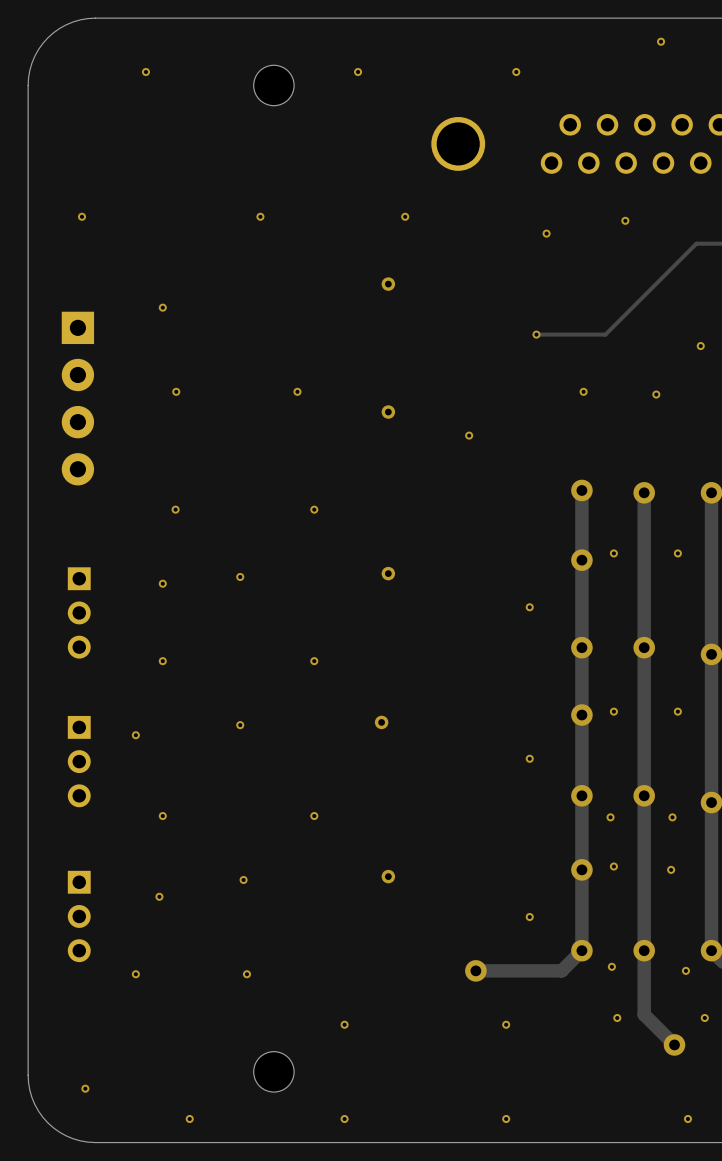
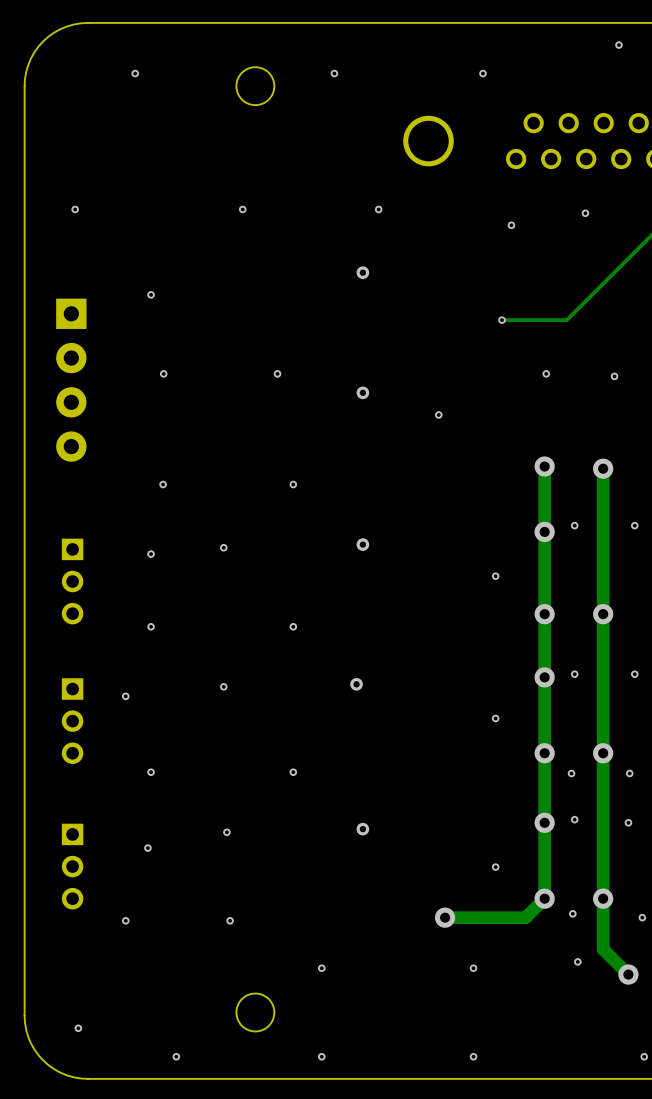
track: (644, 1004) (644, 1014) (674, 1044) -> (603, 949) (628, 974)
via position: (674, 1044) -> (628, 974)

